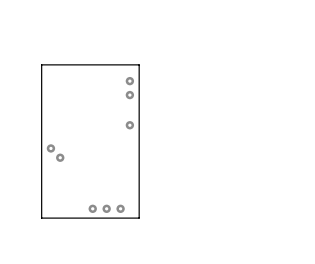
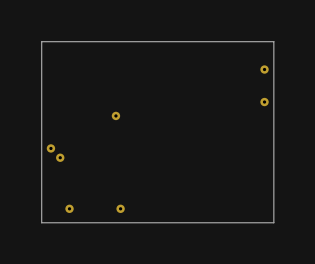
board edge: (41, 64) (139, 64) (139, 218) (41, 218) -> (41, 64) (41, 41) (273, 41) (273, 222) (41, 222) (41, 218)
via: none -> (264, 69)
via: (129, 81) -> none
via: (129, 95) -> none
via: none -> (264, 102)
via: none -> (115, 115)
via: (129, 125) -> none
via: none -> (69, 208)
via: (92, 208) -> none
via: (106, 208) -> none

